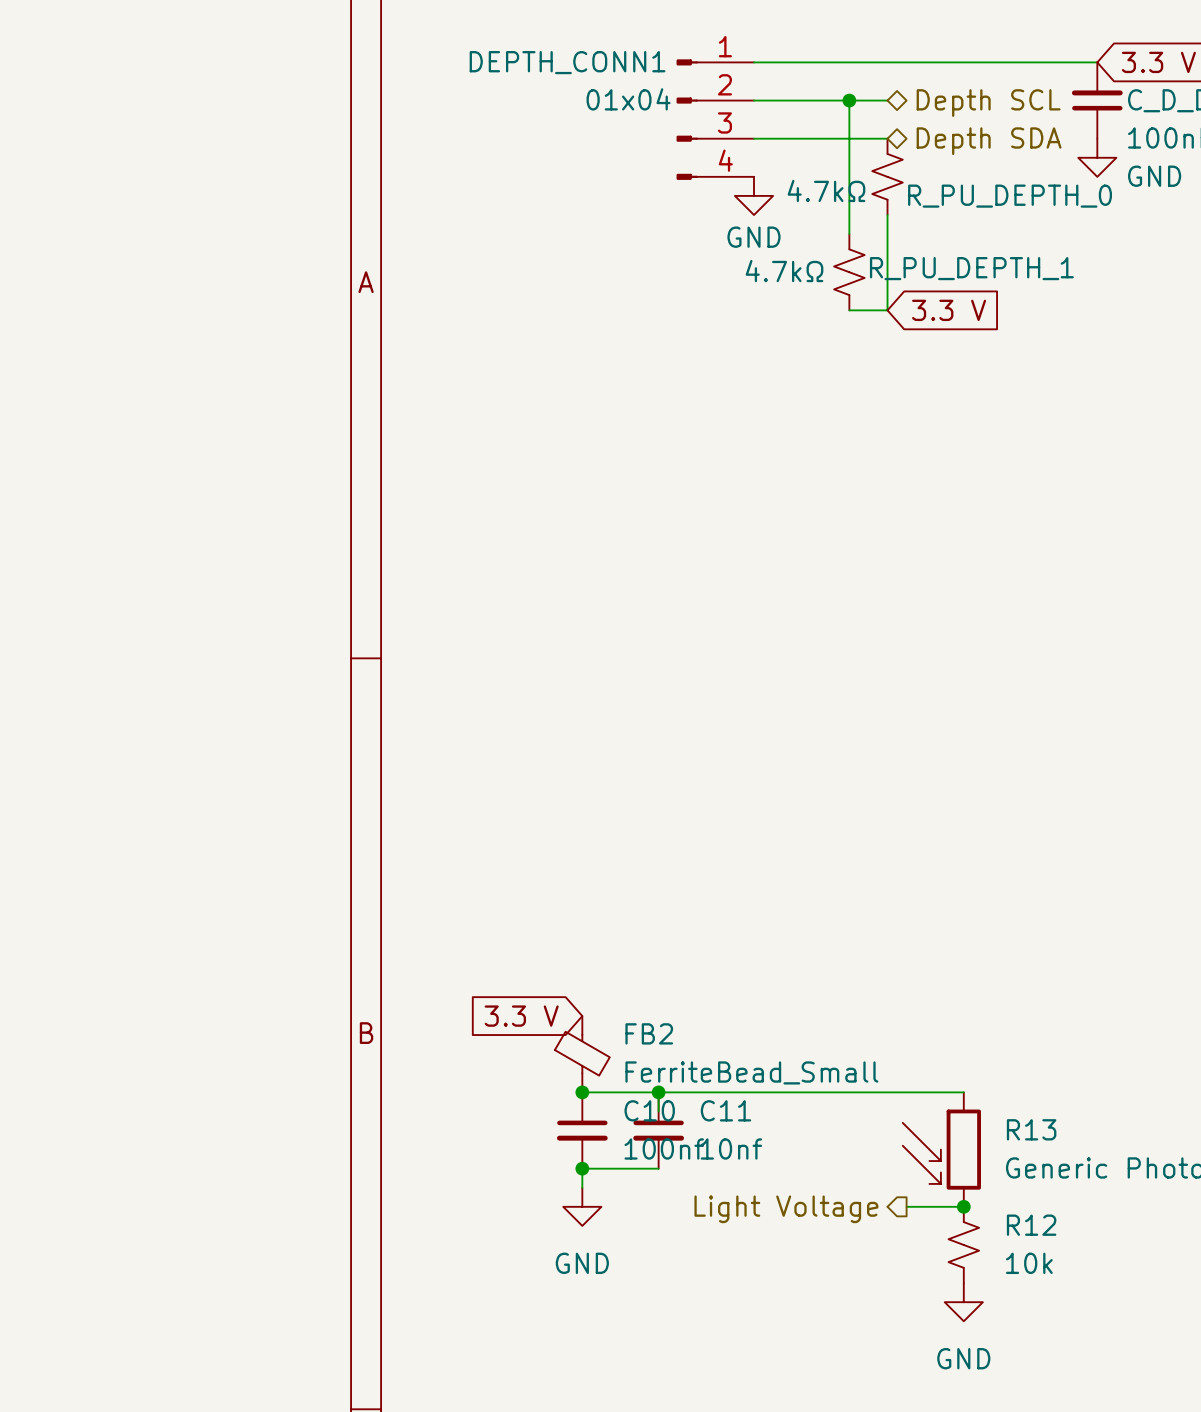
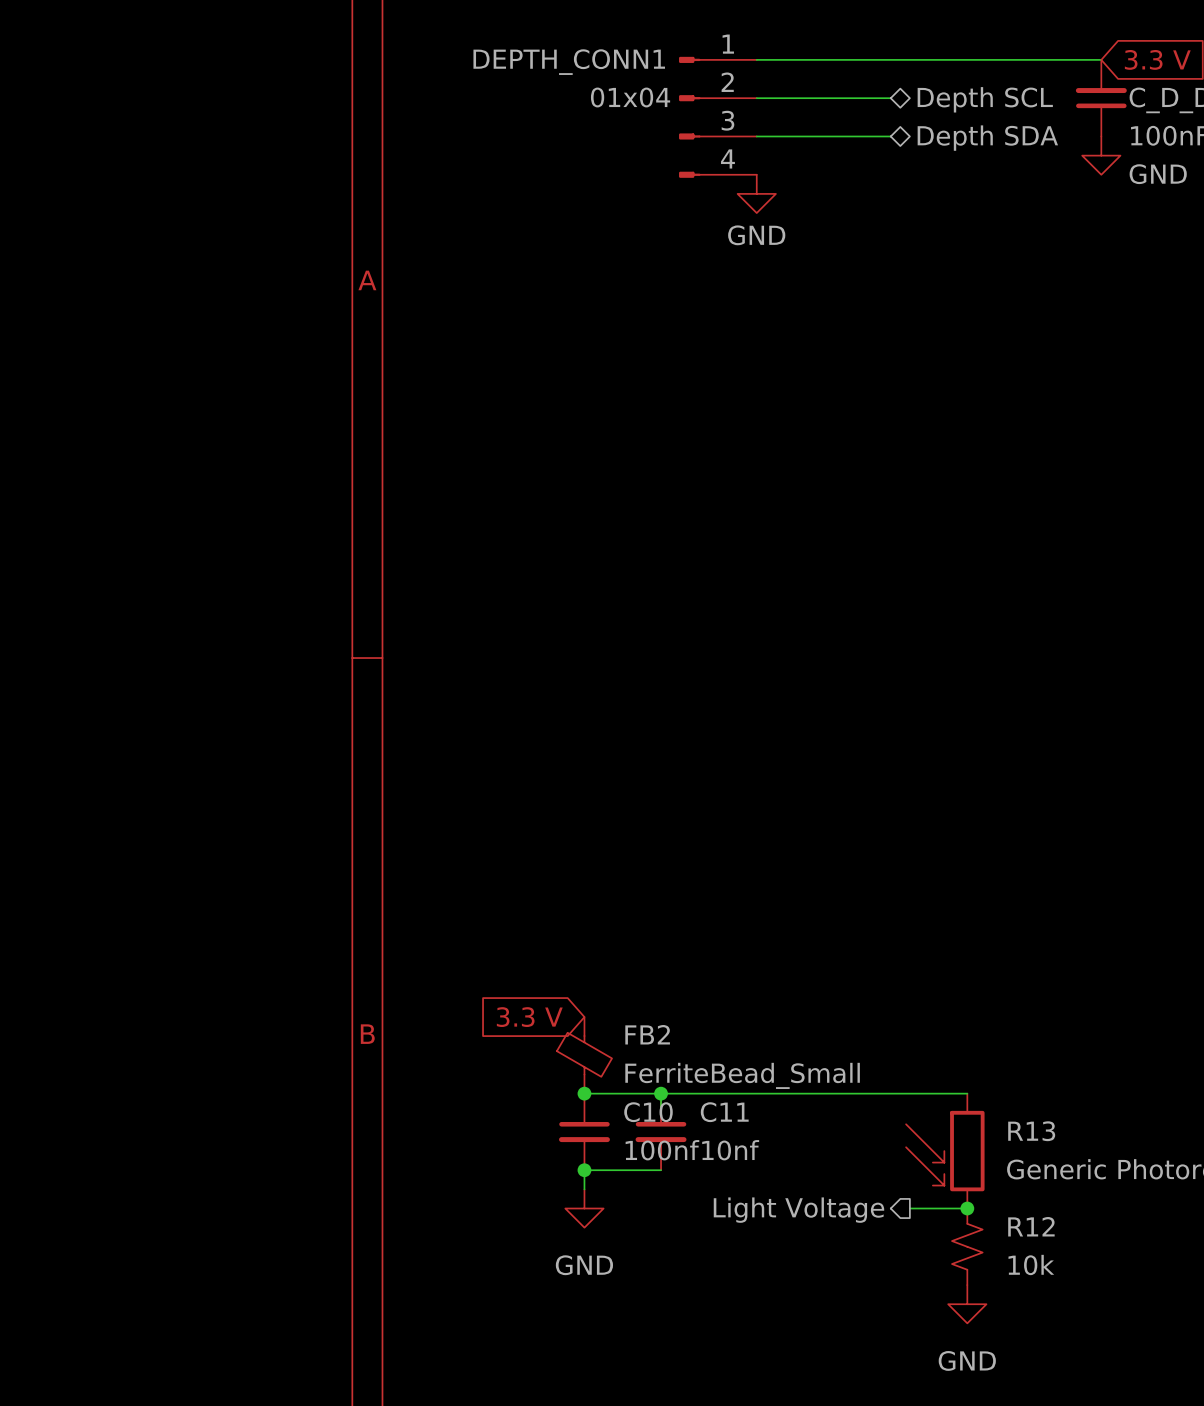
wire: (849, 100) (849, 234) -> none
junction: (849, 100) -> none
R_PU_DEPTH_0: 4.7kΩ (887, 176) -> none
wire: (887, 215) (887, 310) (849, 310) -> none
R_PU_DEPTH_1: 4.7kΩ (849, 272) -> none
global label: 3.3 V (949, 310) -> none

